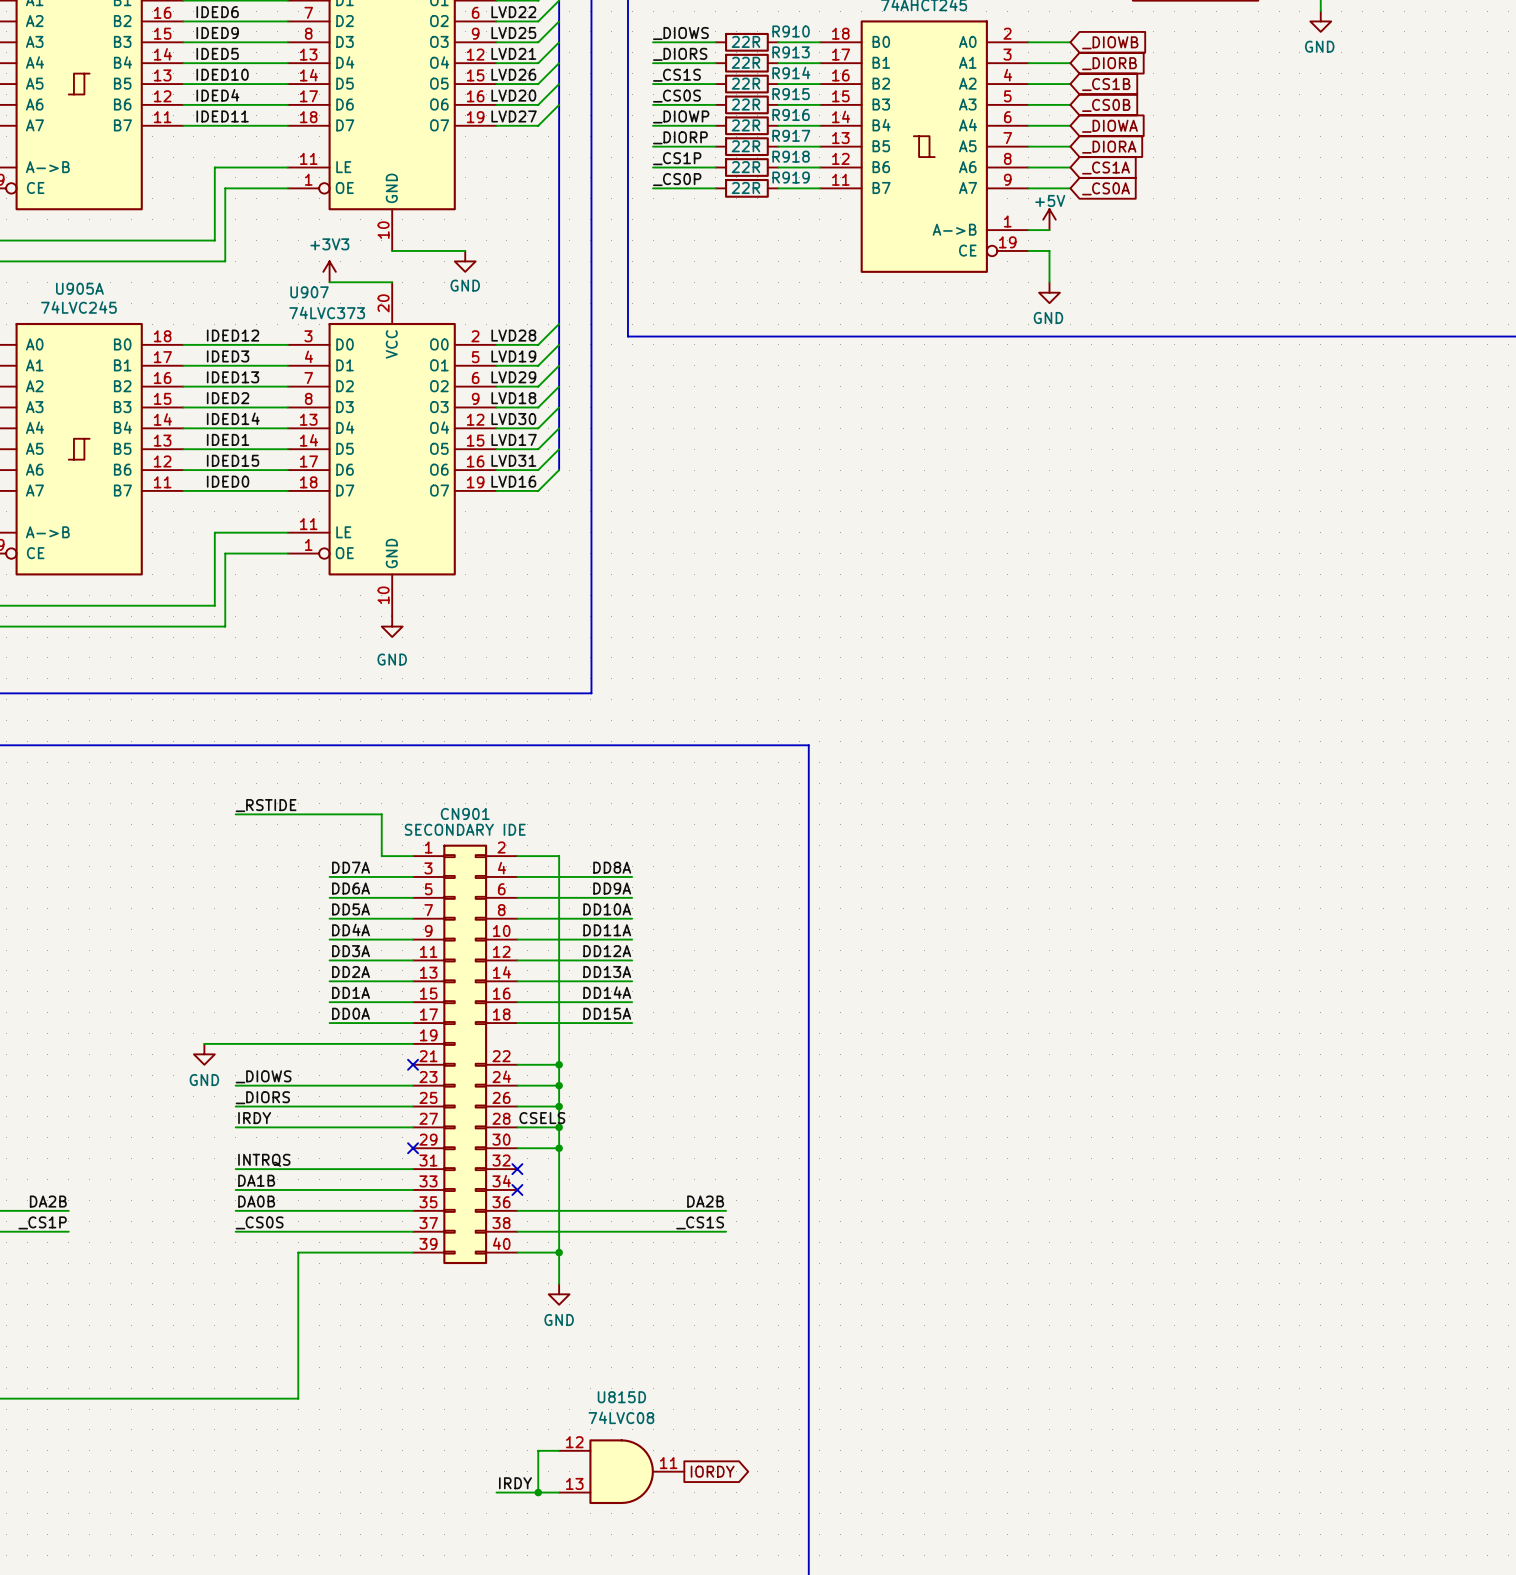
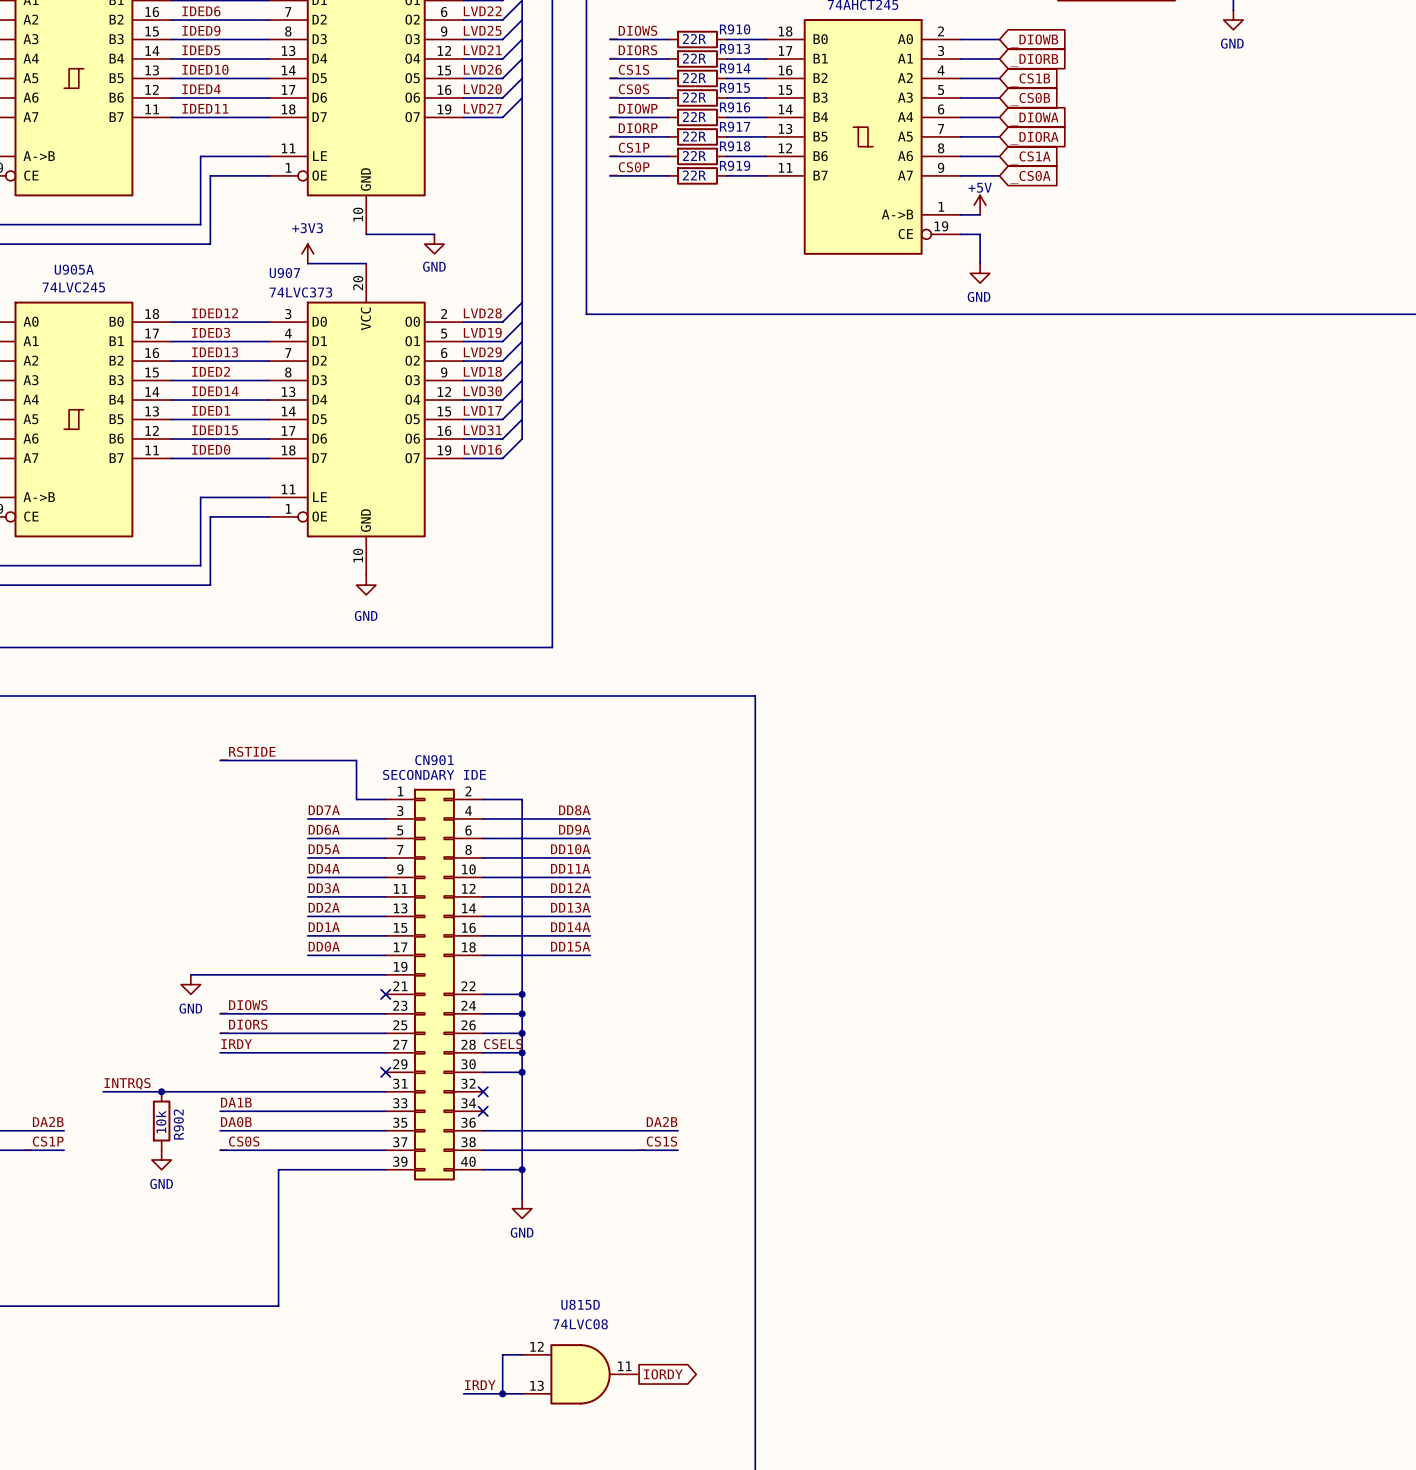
label position: INTRQS (264, 1160) -> INTRQS (127, 1083)
wire: none -> (103, 1091) (220, 1091)
junction: none -> (161, 1091)
R902: none -> 10k (161, 1121)
power symbol: none -> GND (161, 1159)

